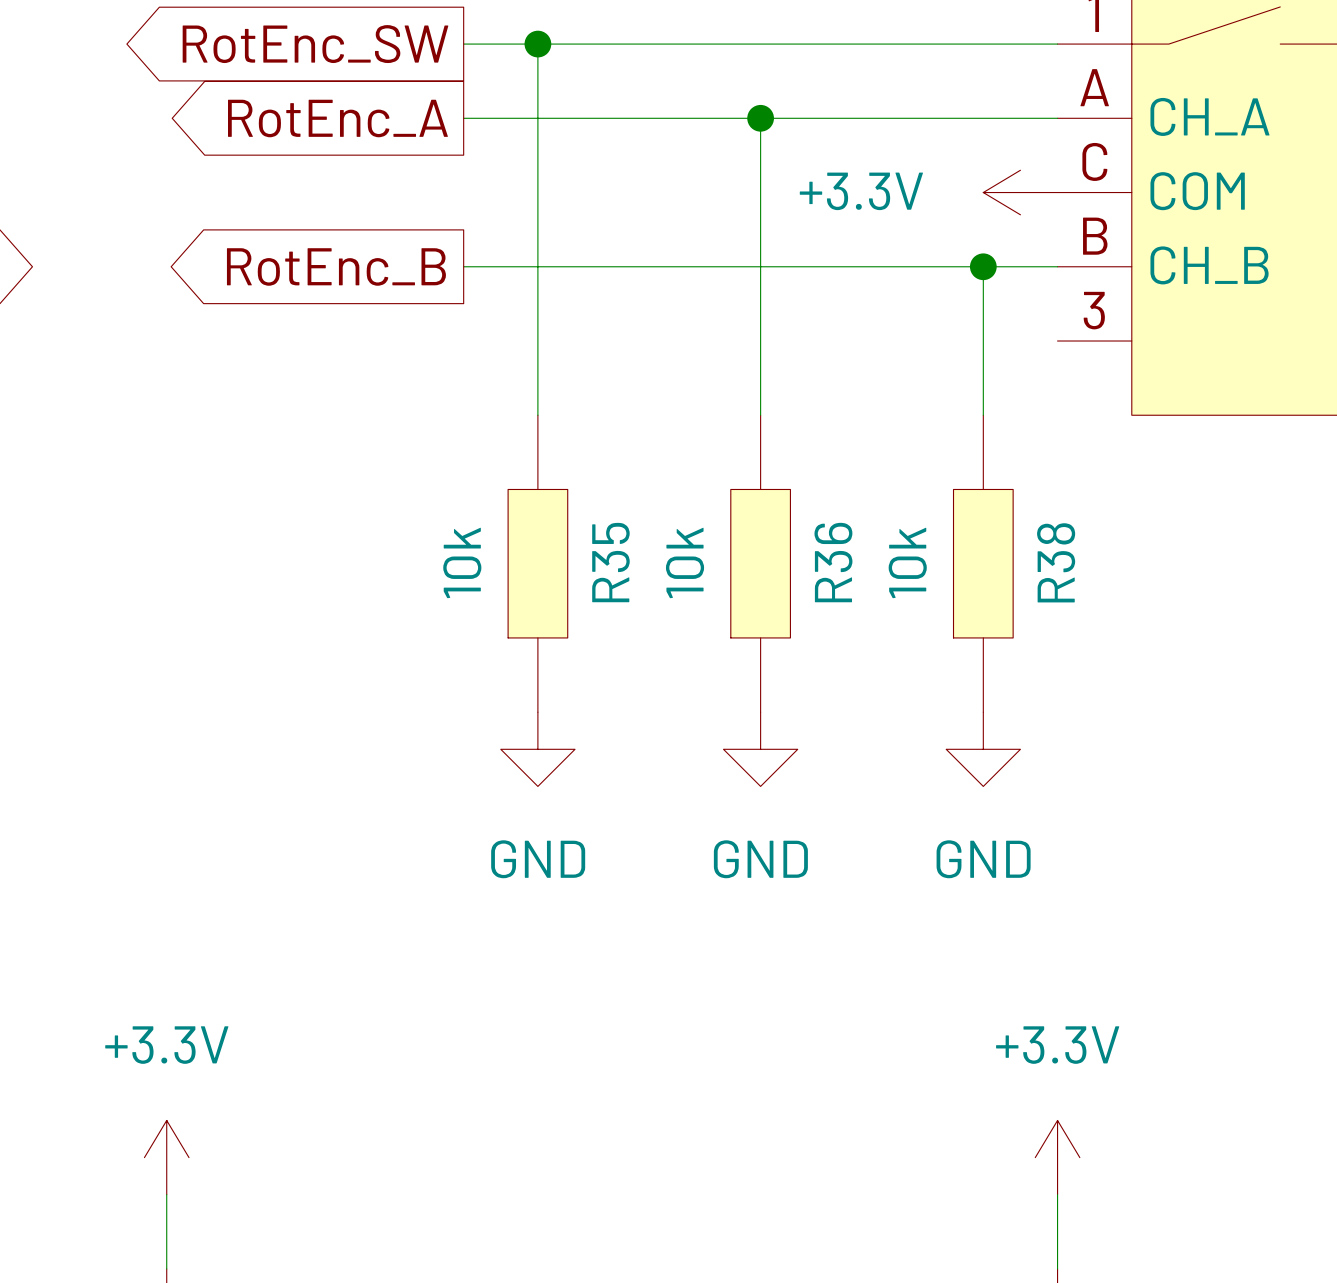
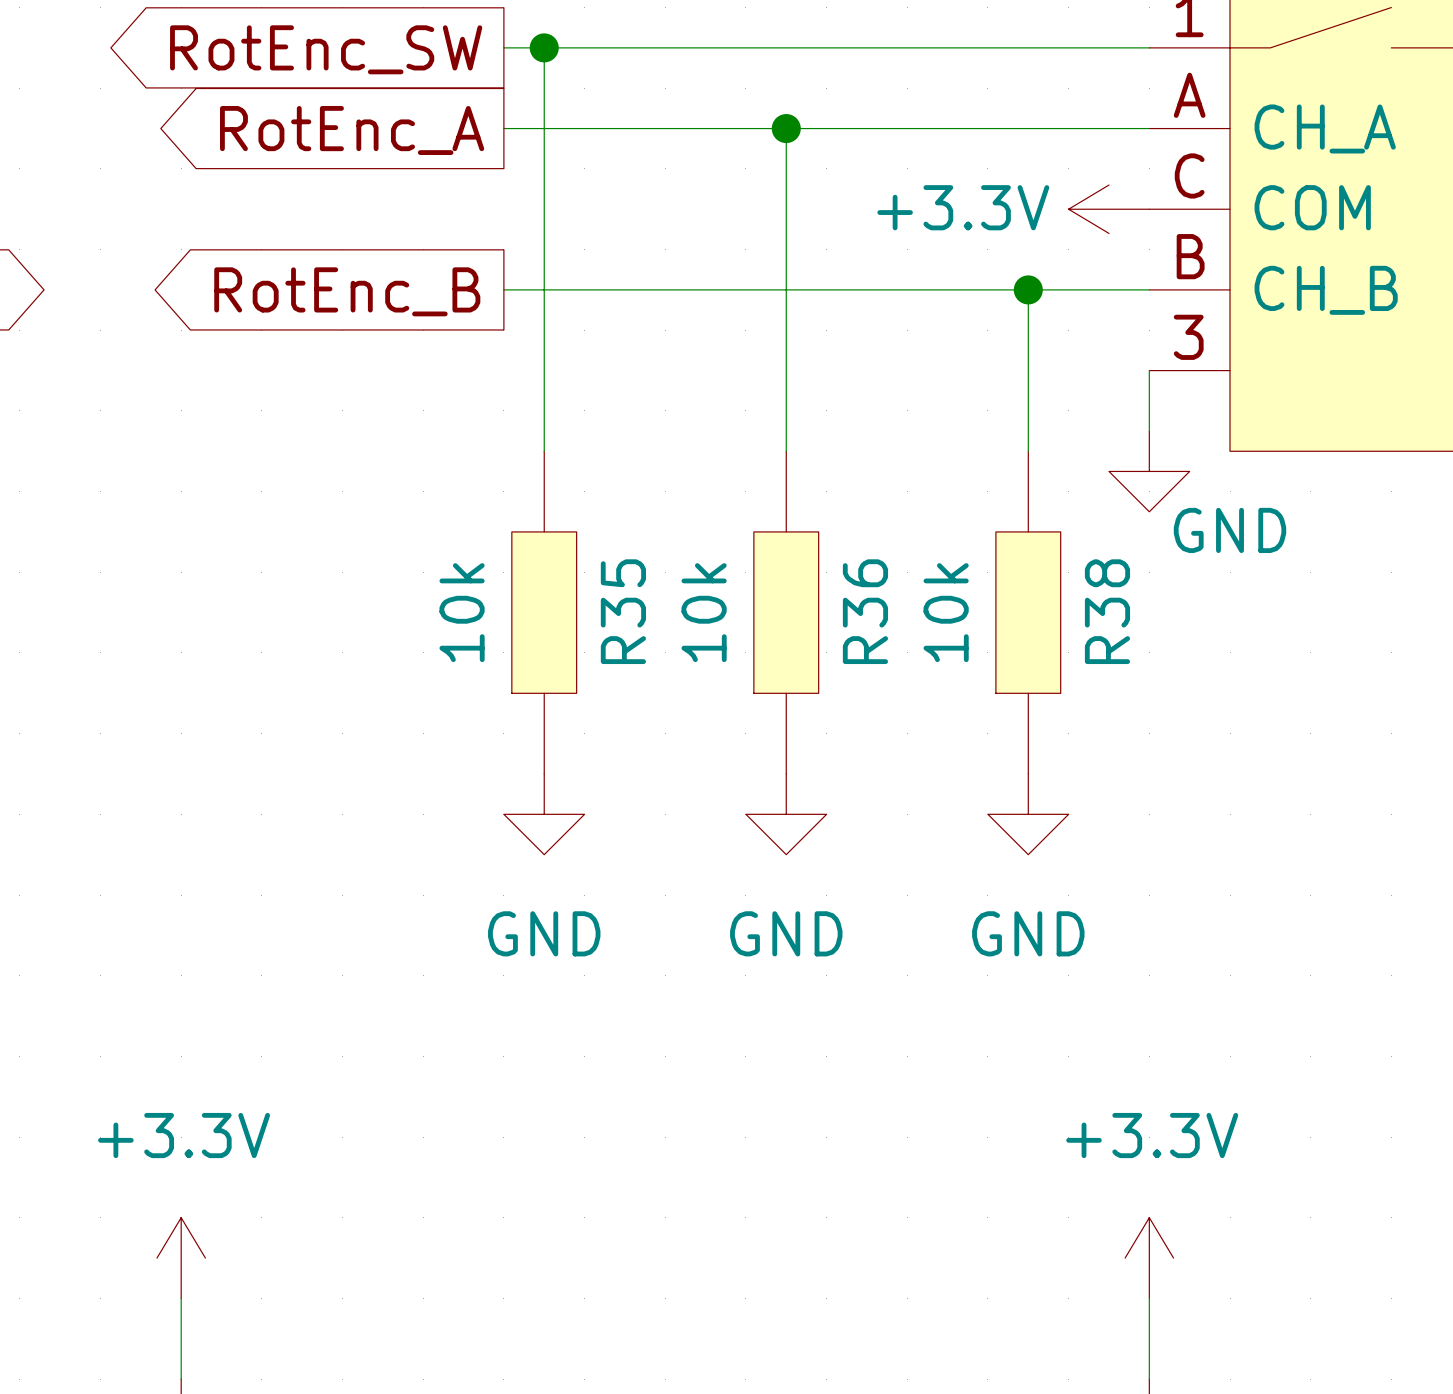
wire: (537, 44) (537, 415) -> (544, 47) (544, 451)
junction position: (537, 44) -> (544, 47)
wire: (760, 118) (760, 415) -> (786, 128) (786, 451)
junction position: (760, 118) -> (786, 128)
wire: (983, 266) (983, 415) -> (1028, 289) (1028, 451)
junction position: (983, 266) -> (1028, 289)
wire: none -> (1149, 370) (1149, 431)
power symbol: none -> GND (1149, 471)
R35 position: (537, 563) -> (544, 612)
R36 position: (760, 563) -> (786, 612)
R38 position: (983, 563) -> (1028, 612)
power symbol position: GND (537, 749) -> GND (544, 814)
power symbol position: GND (760, 749) -> GND (786, 814)
power symbol position: GND (983, 749) -> GND (1028, 814)

